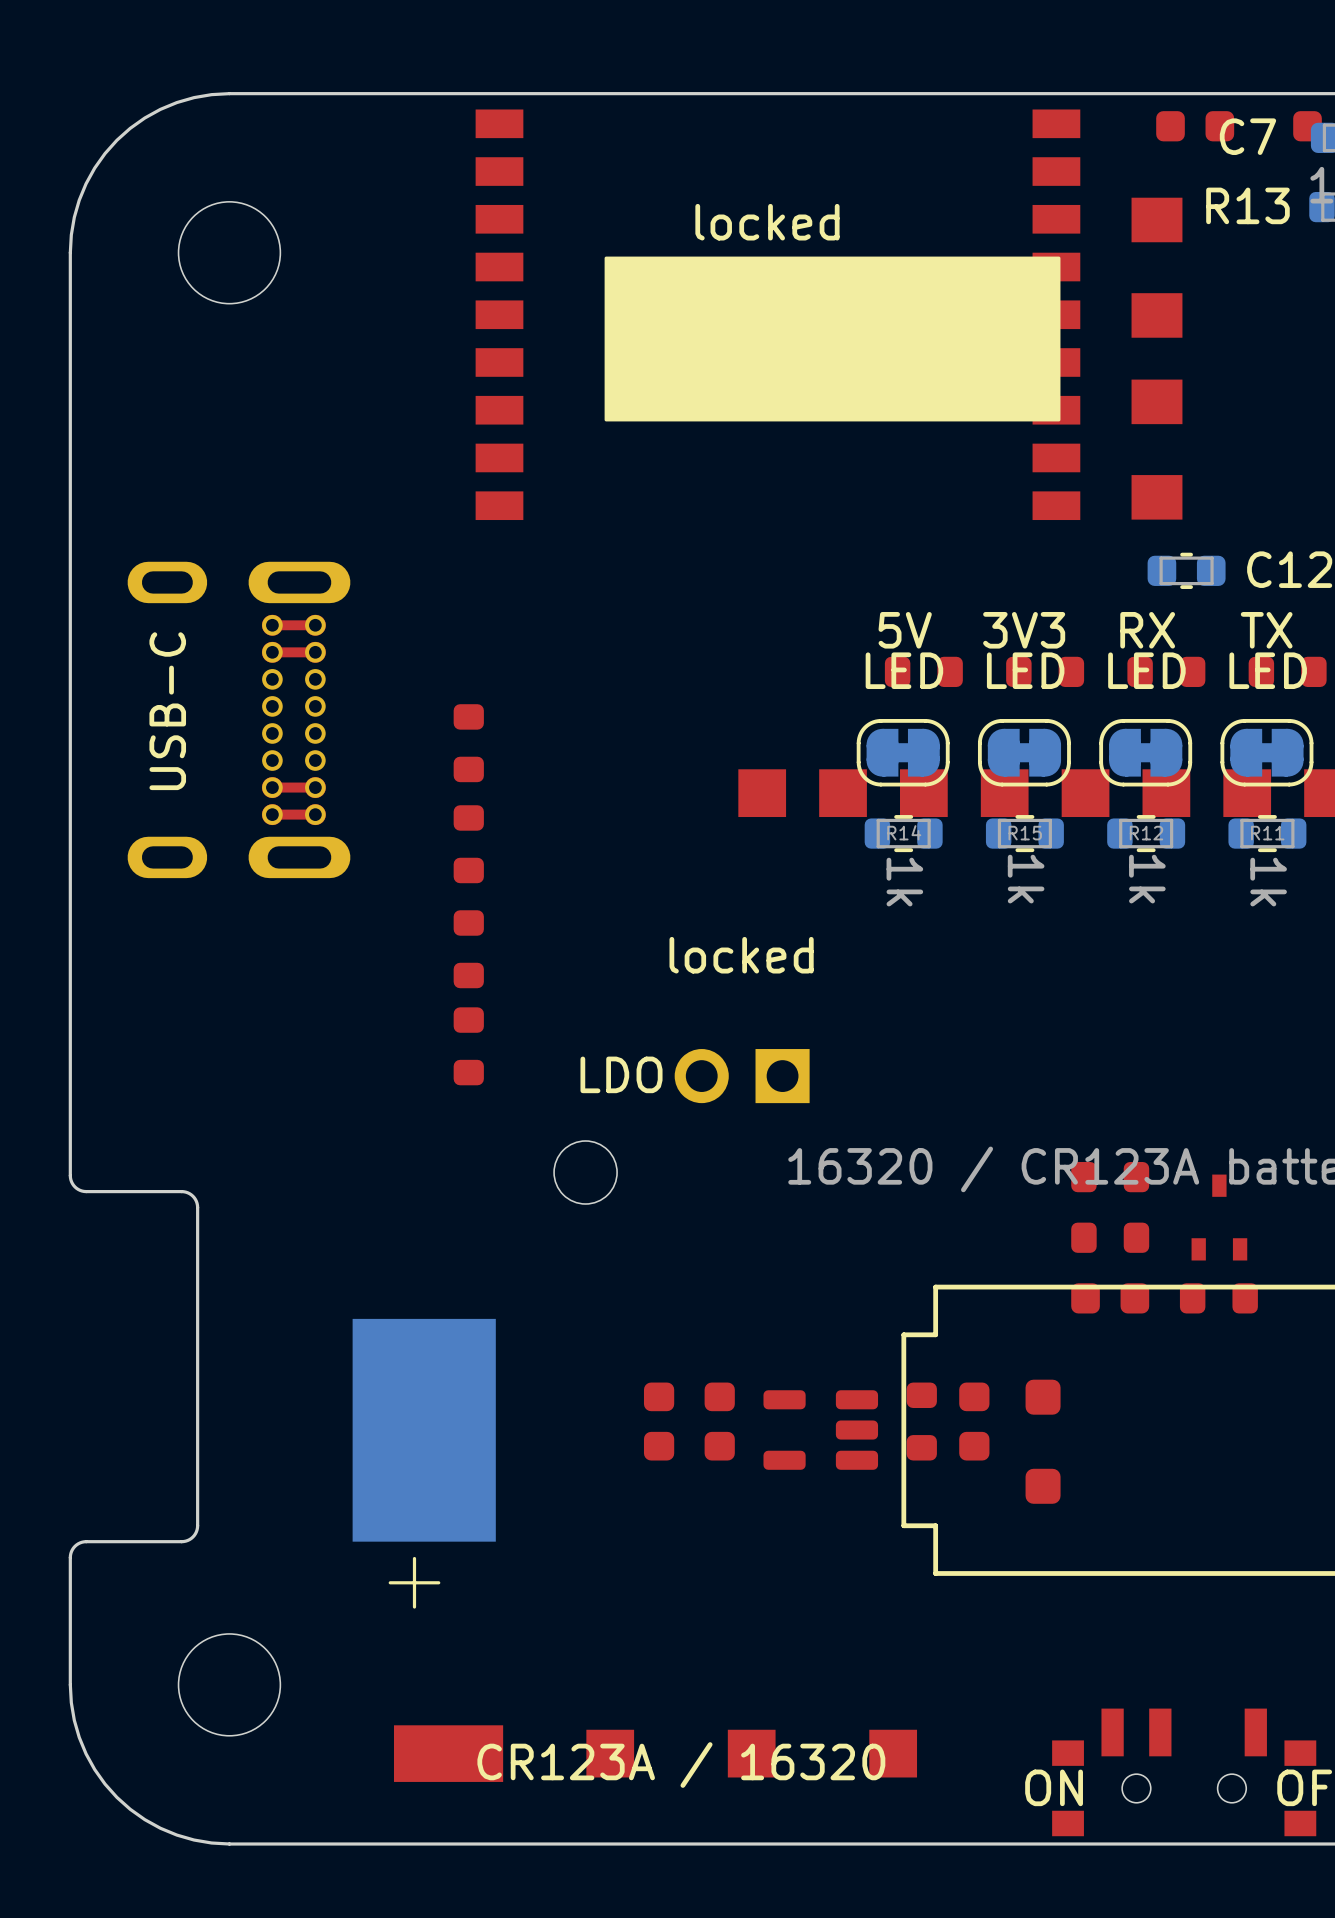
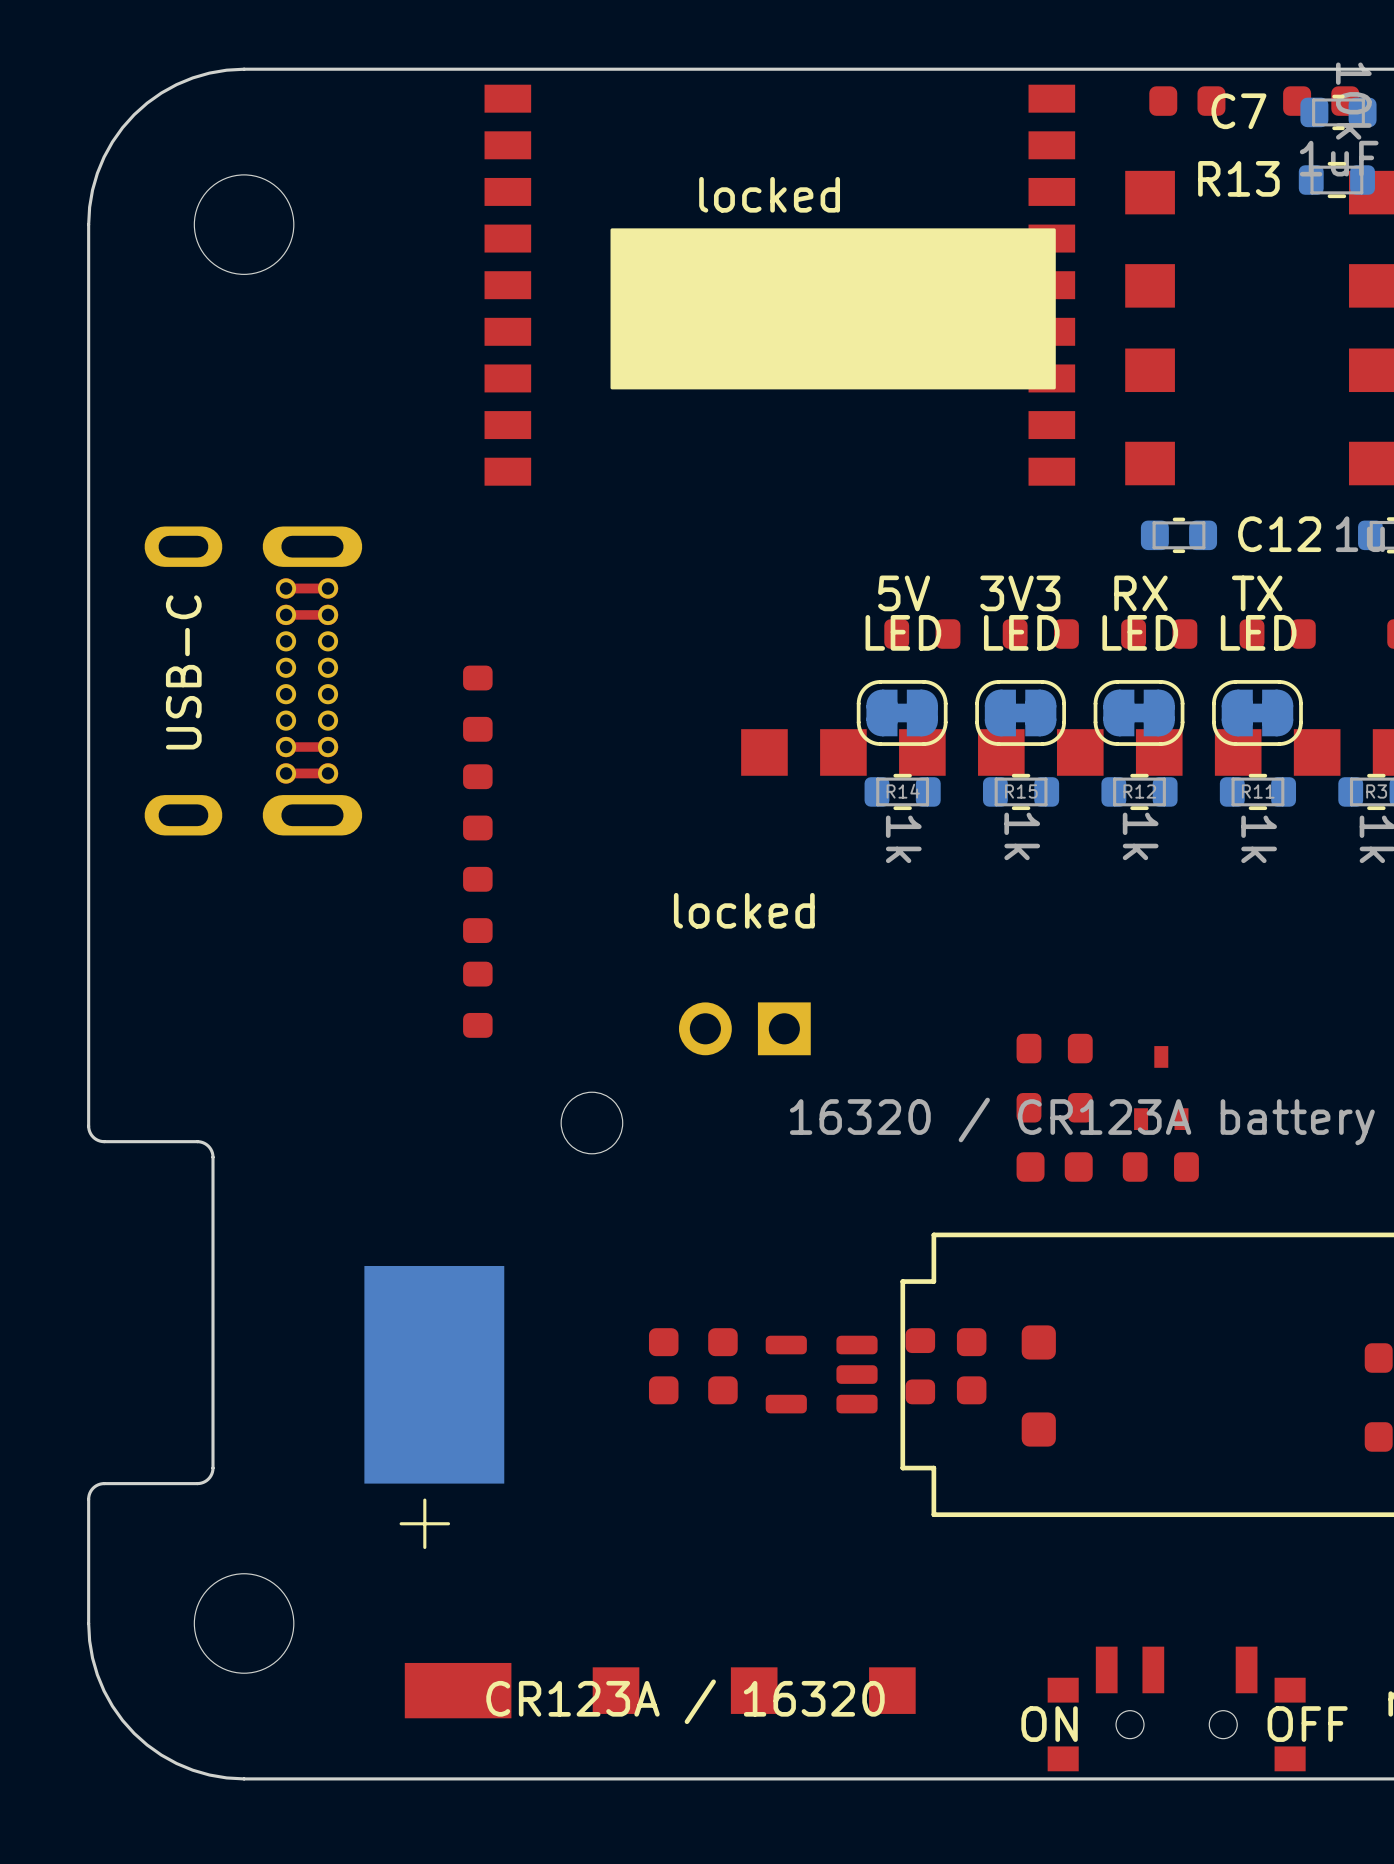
part text: LDO (621, 1074) -> none
part: none -> (1054, 1048)
part: none -> (1054, 1107)
part: (1110, 1177) -> none
part: none -> (1160, 1166)
part position: (1219, 1217) -> (1161, 1088)
part: (1110, 1237) -> none
part position: (1110, 1298) -> (1054, 1166)
part: (1218, 1298) -> none

